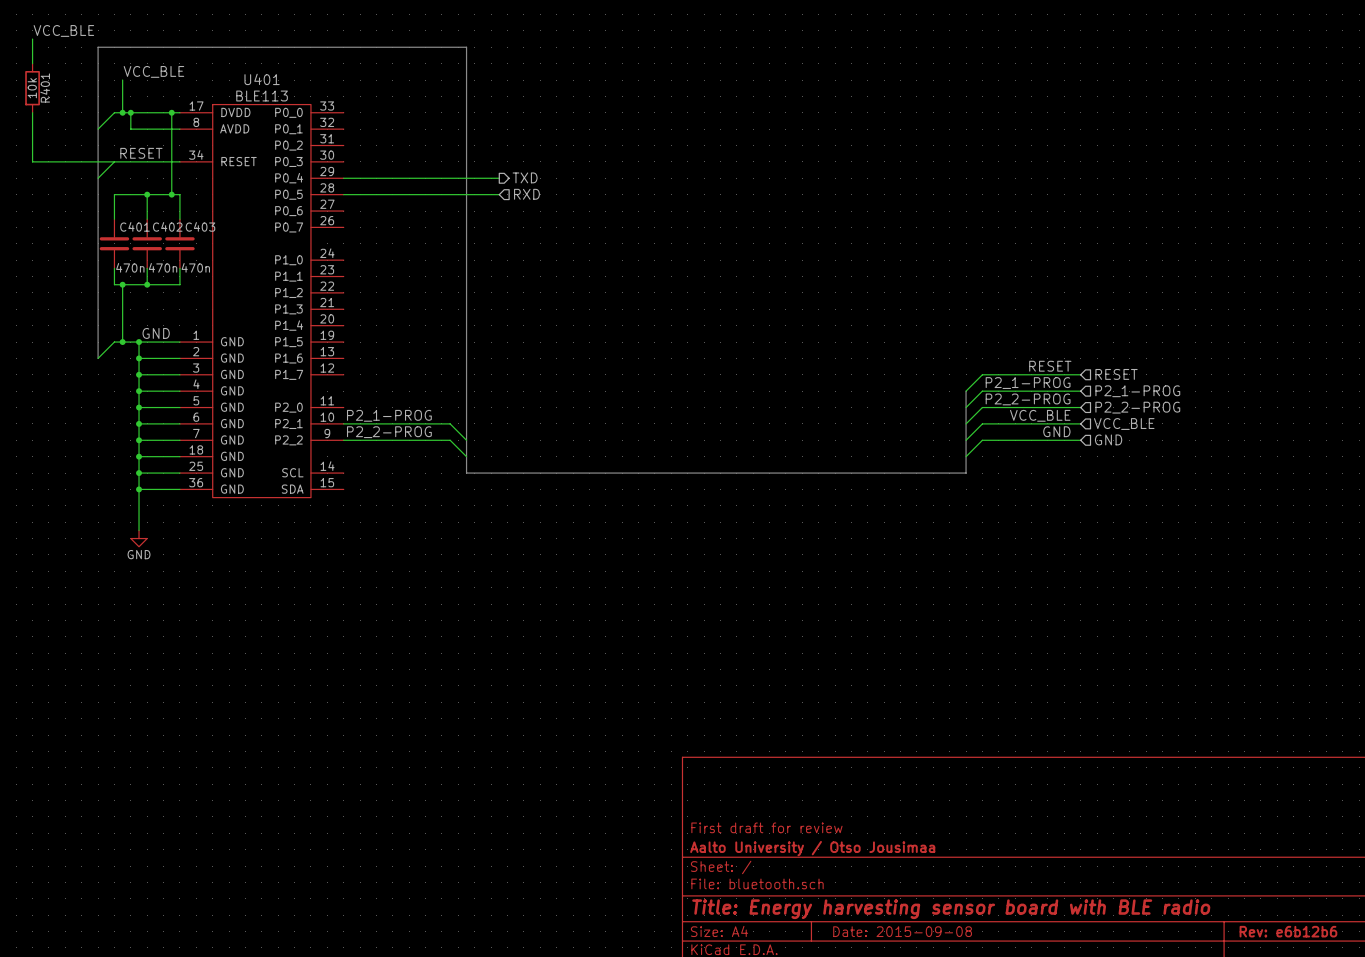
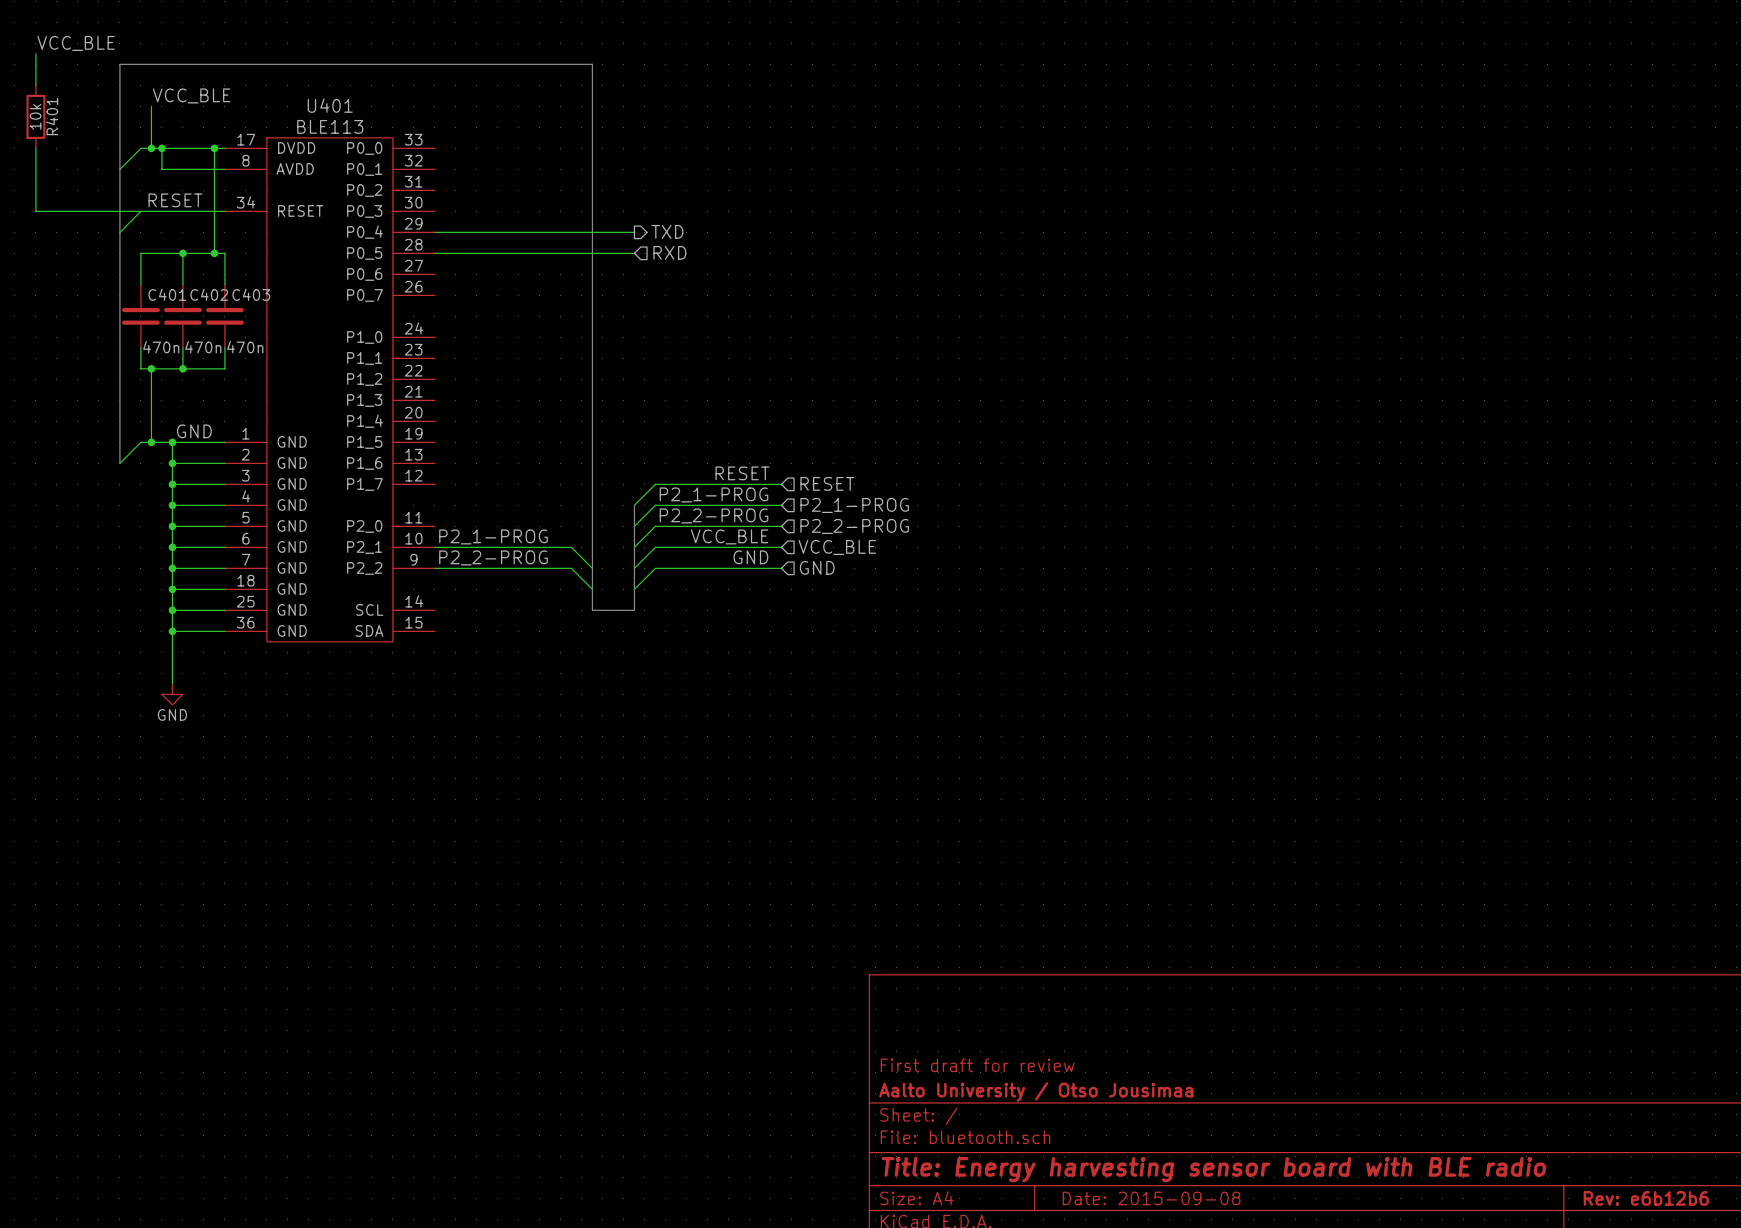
label: none -> RESET (742, 473)
label: RESET (1050, 366) -> none
wire: none -> (781, 484) (655, 484) (634, 505)
hierarchical label: none -> RESET (827, 483)
wire: (1080, 374) (982, 374) (966, 391) -> none
hierarchical label: RESET (1116, 374) -> none
label: none -> P2_1-PROG (714, 494)
label: P2_1-PROG (1028, 383) -> none
wire: none -> (781, 505) (655, 505) (634, 526)
hierarchical label: none -> P2_1-PROG (854, 505)
bus: (966, 391) (966, 473) (499, 473) -> (634, 505) (634, 610)
wire: (1080, 391) (982, 391) (966, 407) -> none
hierarchical label: P2_1-PROG (1137, 391) -> none
label: none -> P2_2-PROG (714, 515)
label: P2_2-PROG (1028, 399) -> none
wire: none -> (781, 526) (655, 526) (634, 547)
hierarchical label: none -> P2_2-PROG (854, 526)
wire: (1080, 407) (982, 407) (966, 423) -> none
hierarchical label: P2_2-PROG (1137, 407) -> none
label: none -> VCC_BLE (729, 536)
label: VCC_BLE (1040, 415) -> none
wire: none -> (781, 547) (655, 547) (634, 568)
wire: (1080, 423) (982, 423) (966, 440) -> none
hierarchical label: none -> VCC_BLE (837, 547)
hierarchical label: VCC_BLE (1124, 424) -> none
label: none -> GND (750, 557)
label: GND (1056, 431) -> none
hierarchical label: none -> GND (817, 567)
hierarchical label: GND (1108, 439) -> none
wire: none -> (781, 568) (655, 568) (634, 589)
wire: (1080, 440) (982, 440) (966, 456) -> none

